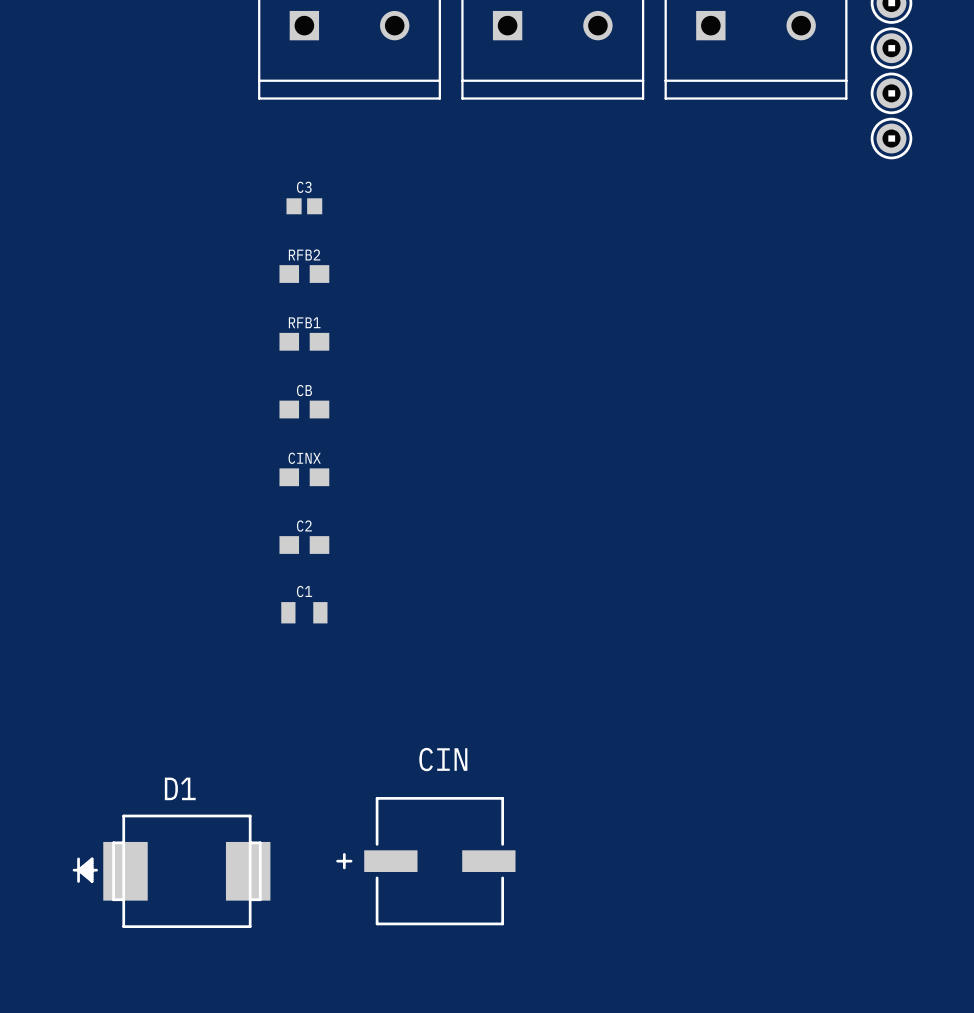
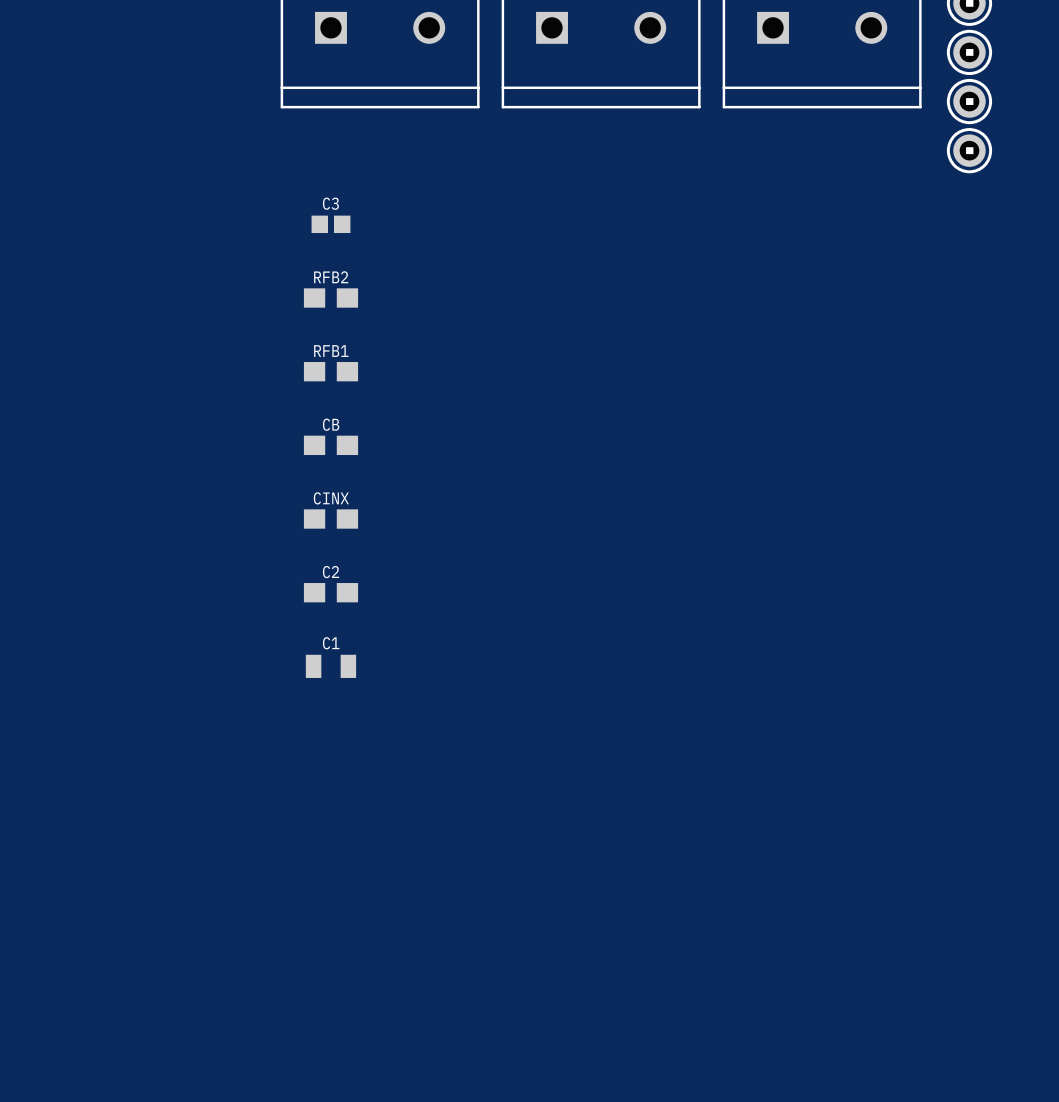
part: (425, 861) -> none
part: (171, 871) -> none

